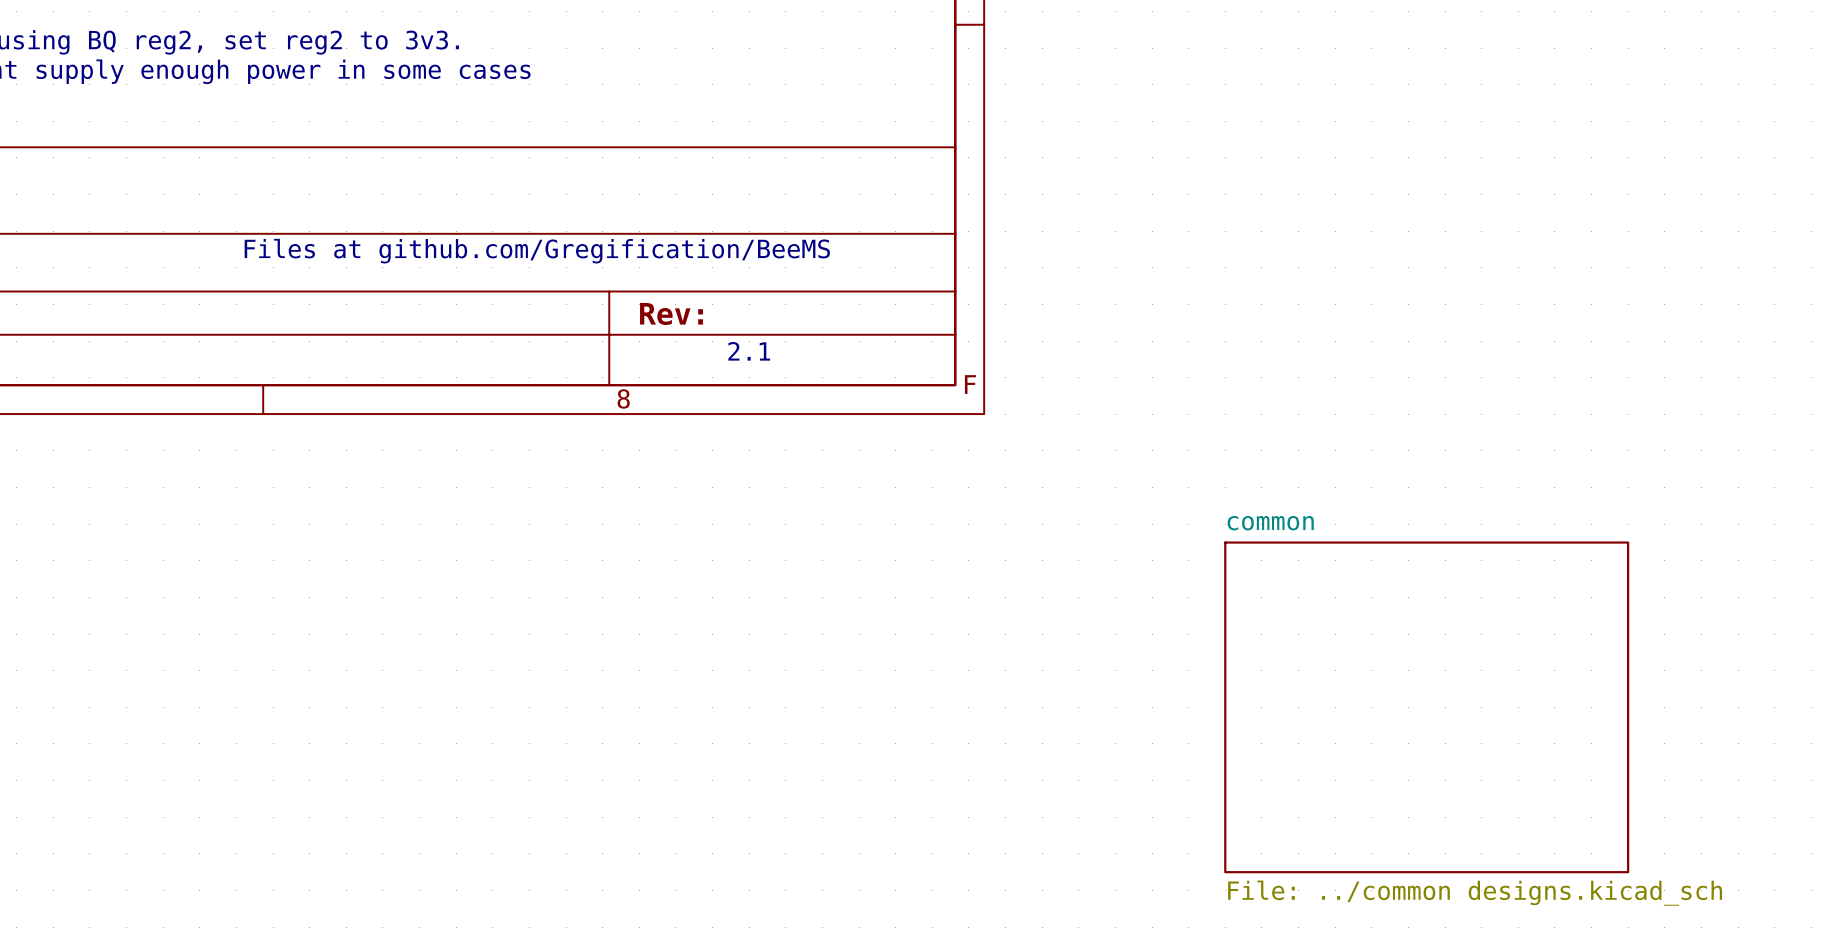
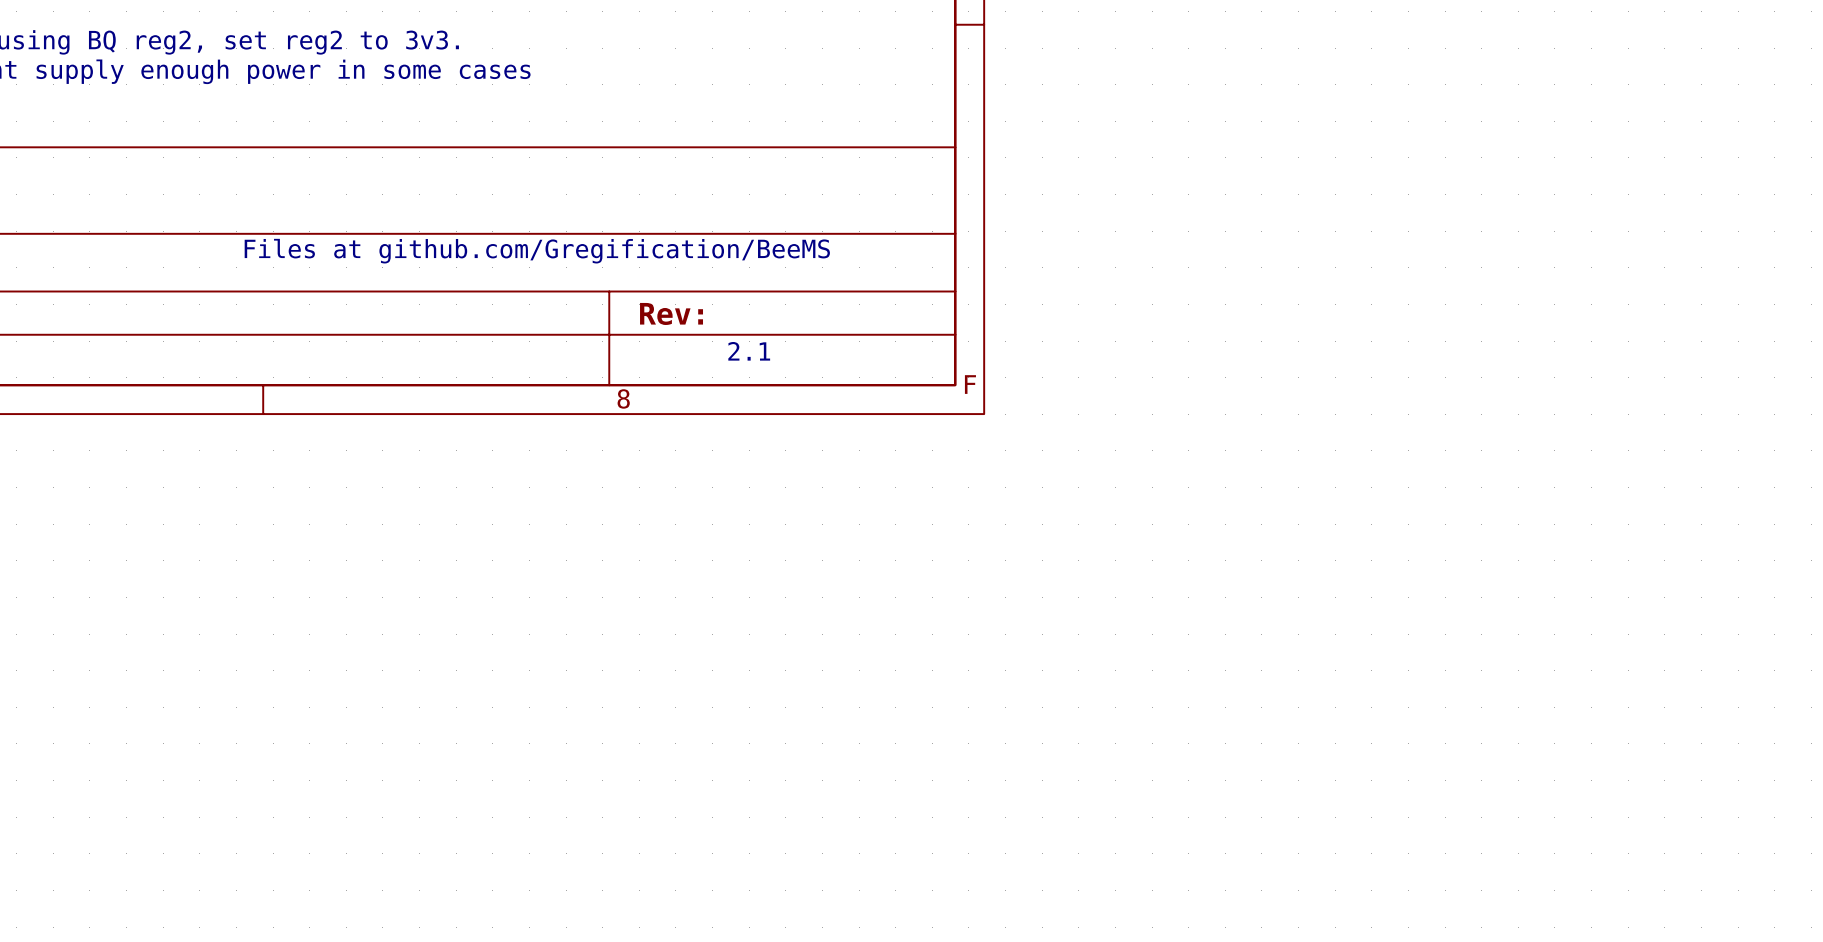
sheet common: File: ../common designs.kicad_sch (1426, 707) -> none

